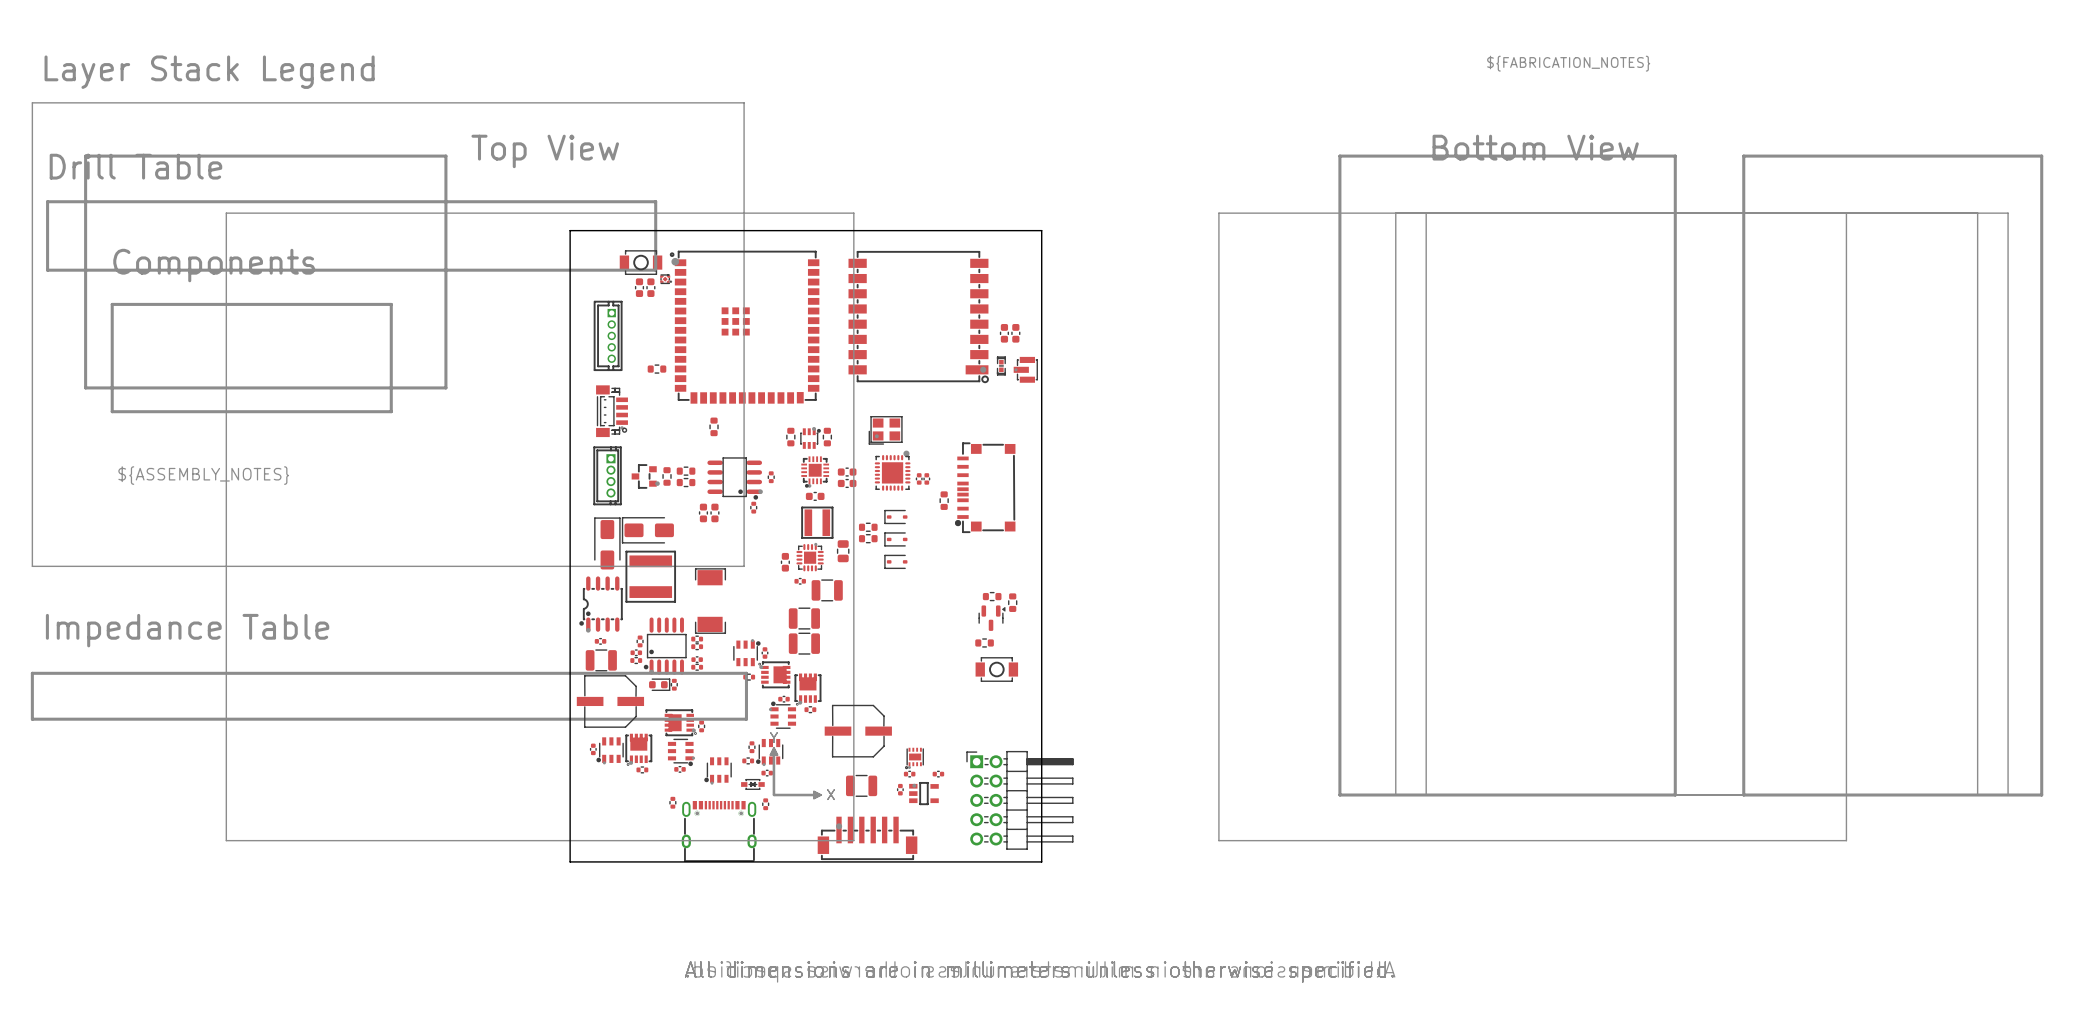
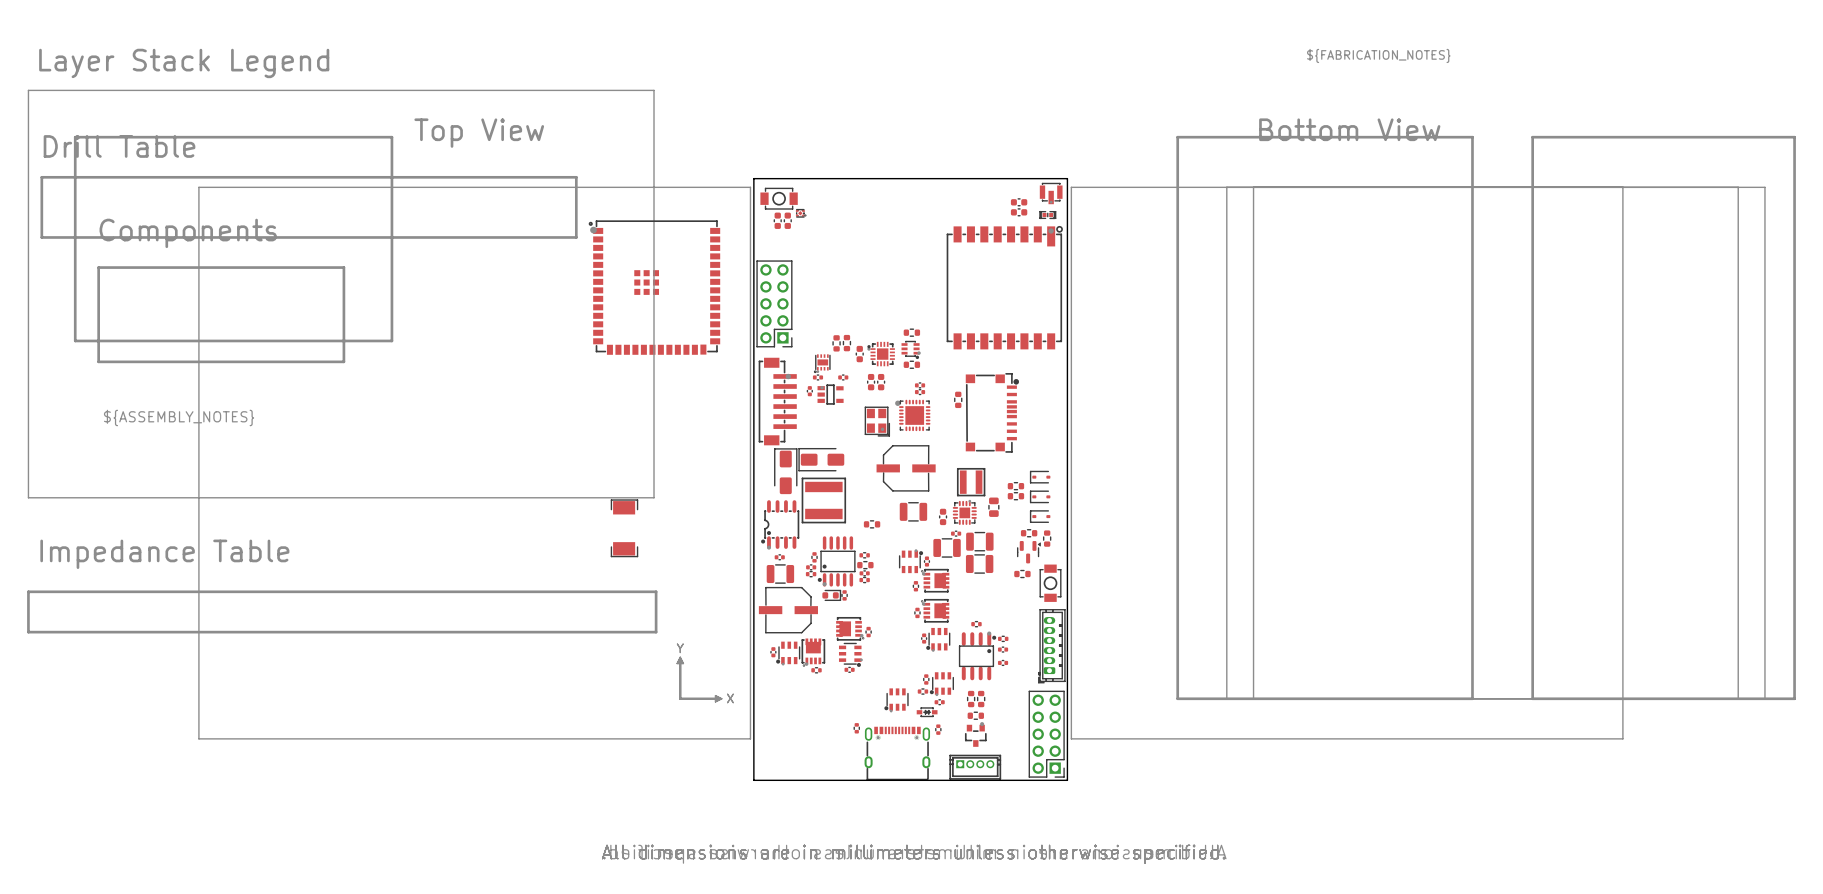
board edge: none -> (753, 178) (1067, 178) (1067, 780) (753, 780) (753, 178)
part: none -> (1051, 193)
part: none -> (779, 198)
board edge: (570, 230) (1041, 230) (1041, 861) (570, 861) (570, 230) -> none
part: none -> (1019, 202)
part: none -> (1019, 212)
part: none -> (801, 213)
part: none -> (1047, 215)
part: none -> (777, 220)
part: none -> (787, 220)
part: (641, 262) -> none
part: (665, 279) -> none
part: (639, 287) -> none
part: (650, 287) -> none
part: (918, 317) -> none
part: none -> (1004, 287)
part: (1004, 333) -> none
part: (1015, 333) -> none
part: (608, 335) -> none
part: none -> (774, 303)
part: (1001, 365) -> none
part: (656, 369) -> none
part: (1025, 369) -> none
part: none -> (911, 332)
part: none -> (836, 343)
part: none -> (846, 343)
part: none -> (911, 350)
part: none -> (859, 354)
part: none -> (881, 354)
part: (612, 411) -> none
part: none -> (822, 363)
part: none -> (911, 364)
part: (714, 426) -> none
part: none -> (817, 377)
part: none -> (843, 377)
part rotation: 0° (885, 430) -> 90° counterclockwise (877, 421)
part position: (885, 430) -> (877, 421)
part: none -> (871, 382)
part: none -> (881, 382)
part: (790, 437) -> none
part: (810, 437) -> none
part: (827, 437) -> none
part: none -> (920, 385)
part: none -> (809, 391)
part: none -> (920, 392)
part: none -> (830, 393)
part: none -> (958, 399)
part: none -> (777, 401)
part rotation: 0° (892, 470) -> 90° counterclockwise (912, 415)
part position: (892, 470) -> (912, 415)
part: (686, 471) -> none
part: (815, 472) -> none
part: (847, 472) -> none
part: (607, 475) -> none
part: (645, 476) -> none
part: (667, 476) -> none
part: (771, 477) -> none
part: (735, 478) -> none
part: (919, 478) -> none
part: (926, 478) -> none
part: (686, 482) -> none
part: (847, 483) -> none
part rotation: 0° (985, 487) -> 180° (992, 412)
part position: (985, 487) -> (992, 412)
part: (815, 496) -> none
part: (944, 500) -> none
part: (753, 507) -> none
part: (703, 512) -> none
part: (714, 512) -> none
part: (895, 517) -> none
part: (817, 522) -> none
part: none -> (821, 459)
part: (868, 527) -> none
part: (648, 530) -> none
part footprint: [884, 532, 908, 547] -> [774, 448, 798, 495]
part: none -> (906, 468)
part: (868, 538) -> none
part: none -> (1040, 477)
part: (607, 543) -> none
part: none -> (971, 482)
part: (843, 551) -> none
part: none -> (1015, 486)
part: (810, 557) -> none
part: (895, 561) -> none
part: (785, 562) -> none
part: none -> (1015, 496)
part: none -> (1040, 496)
part: none -> (823, 500)
part: (650, 576) -> none
part: none -> (993, 507)
part: (800, 581) -> none
part: none -> (913, 511)
part: none -> (964, 512)
part: none -> (1040, 516)
part: none -> (943, 516)
part: (827, 590) -> none
part: none -> (780, 524)
part: (1012, 602) -> none
part: (601, 604) -> none
part: none -> (1029, 533)
part: none -> (956, 533)
part: none -> (1047, 538)
part: none -> (979, 541)
part: (804, 618) -> none
part position: (992, 618) -> (1029, 552)
part: none -> (947, 547)
part: none -> (864, 555)
part: none -> (779, 557)
part: none -> (814, 557)
part: none -> (836, 561)
part: none -> (911, 561)
part: none -> (926, 561)
part: (697, 639) -> none
part: (600, 641) -> none
part: (640, 641) -> none
part: none -> (979, 563)
part: (804, 643) -> none
part: none -> (811, 567)
part: (665, 646) -> none
part: (697, 646) -> none
part: (636, 652) -> none
part: (746, 652) -> none
part: none -> (864, 573)
part: (764, 653) -> none
part: none -> (780, 574)
part: none -> (811, 574)
part: none -> (1022, 574)
part: (697, 659) -> none
part: none -> (864, 580)
part: (601, 660) -> none
part: (636, 660) -> none
part: none -> (935, 580)
part: none -> (1050, 583)
part: none -> (915, 586)
part: (697, 667) -> none
part: (996, 669) -> none
part: (774, 674) -> none
part: (749, 677) -> none
part: none -> (831, 595)
part: none -> (844, 595)
part: (659, 684) -> none
part: (674, 684) -> none
part: (807, 689) -> none
part: none -> (935, 610)
part: none -> (917, 612)
part: (784, 699) -> none
part: (610, 701) -> none
part: (810, 709) -> none
part: none -> (976, 624)
part: (782, 715) -> none
part: none -> (850, 628)
part: none -> (868, 632)
part: (680, 722) -> none
part: (701, 726) -> none
part: none -> (924, 638)
part: none -> (1003, 638)
part: none -> (938, 639)
part position: (858, 731) -> (788, 610)
part: none -> (1051, 646)
part: none -> (1003, 649)
part: none -> (773, 652)
part: none -> (813, 652)
part: none -> (788, 653)
part: none -> (850, 654)
part: none -> (977, 655)
part: (751, 747) -> none
part: (593, 749) -> none
part: (638, 749) -> none
part: (610, 750) -> none
part footprint: [966, 751, 1074, 850] -> [884, 688, 909, 713]
part: (681, 752) -> none
part: (769, 752) -> none
part: none -> (1003, 662)
part: (914, 758) -> none
part: (748, 760) -> none
part: none -> (816, 670)
part: none -> (849, 669)
part: (642, 769) -> none
part: (679, 769) -> none
part: (718, 770) -> none
part: (767, 773) -> none
part: none -> (926, 679)
part: (909, 774) -> none
part: (938, 774) -> none
part: none -> (941, 684)
part: (752, 784) -> none
part: (861, 785) -> none
part: none -> (922, 691)
part: (900, 789) -> none
part: (923, 792) -> none
part: none -> (971, 699)
part: none -> (981, 699)
part: none -> (939, 702)
part: (672, 802) -> none
part: (765, 804) -> none
part: none -> (927, 712)
part: none -> (975, 715)
part: none -> (856, 728)
part: none -> (938, 729)
part: (719, 831) -> none
part: none -> (975, 734)
part: none -> (1046, 734)
part: (867, 838) -> none
part: none -> (897, 753)
part: none -> (975, 767)

